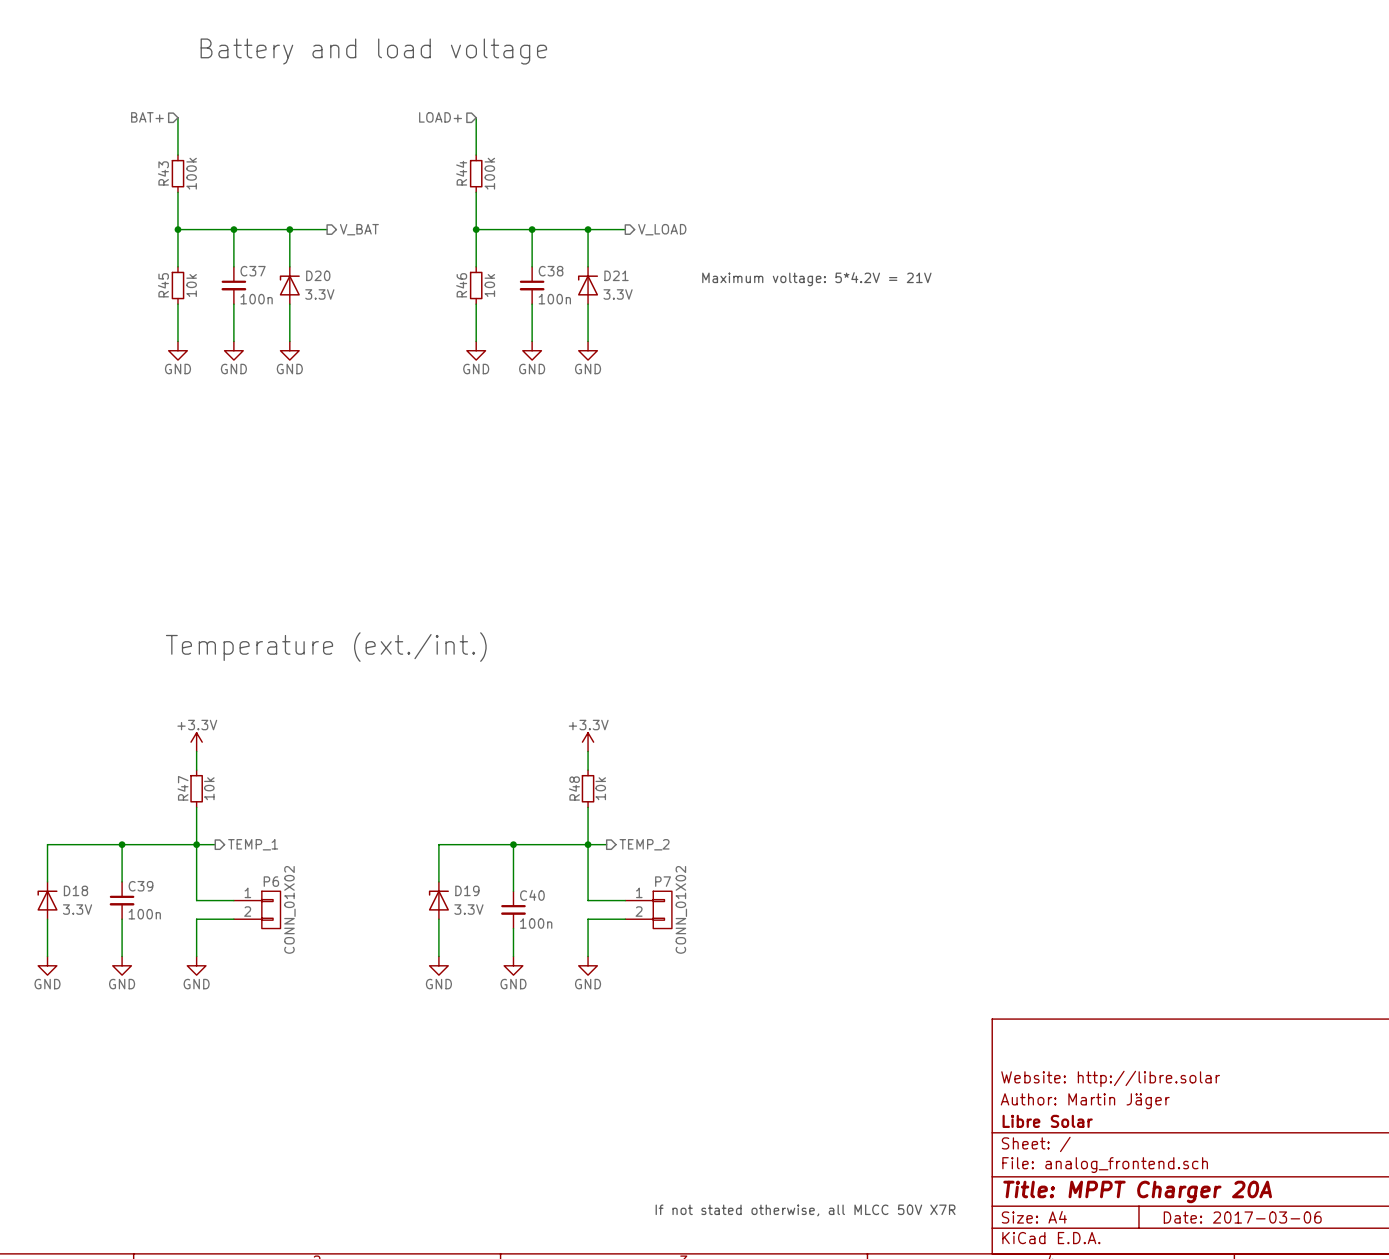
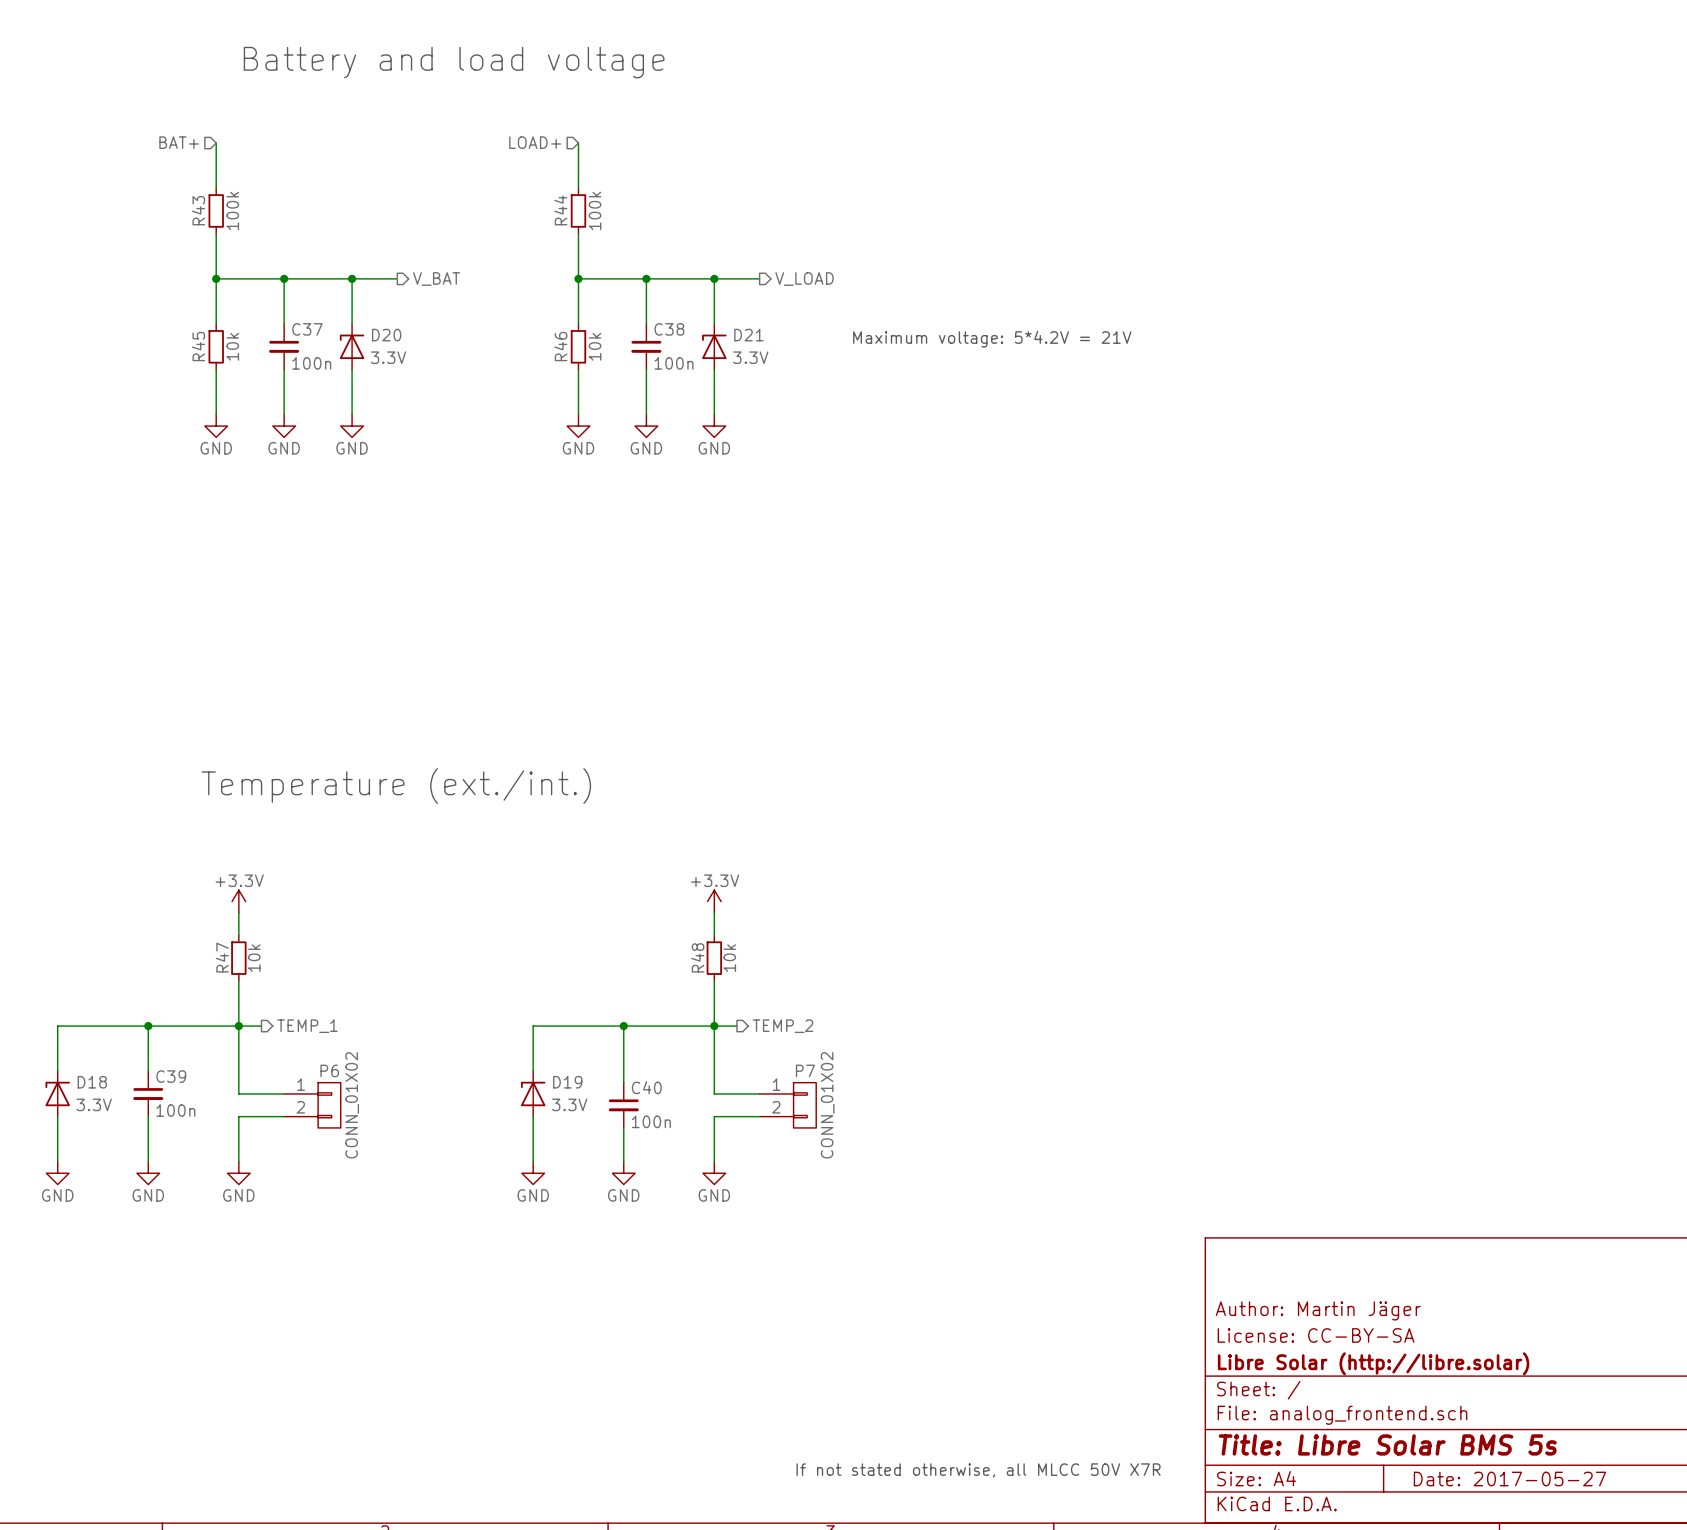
title block: Website: http://libre.solar (1110, 1078) -> Author: Martin Jäger (1318, 1310)
title block: Author: Martin Jäger (1085, 1101) -> License: CC-BY-SA (1316, 1335)
title block: Libre Solar (1047, 1121) -> Libre Solar (http://libre.solar) (1373, 1363)
title block: Title: MPPT Charger 20A (1137, 1191) -> Title: Libre Solar BMS 5s (1387, 1444)
title block: Date: 2017-03-06 (1242, 1217) -> Date: 2017-05-27 (1509, 1478)

